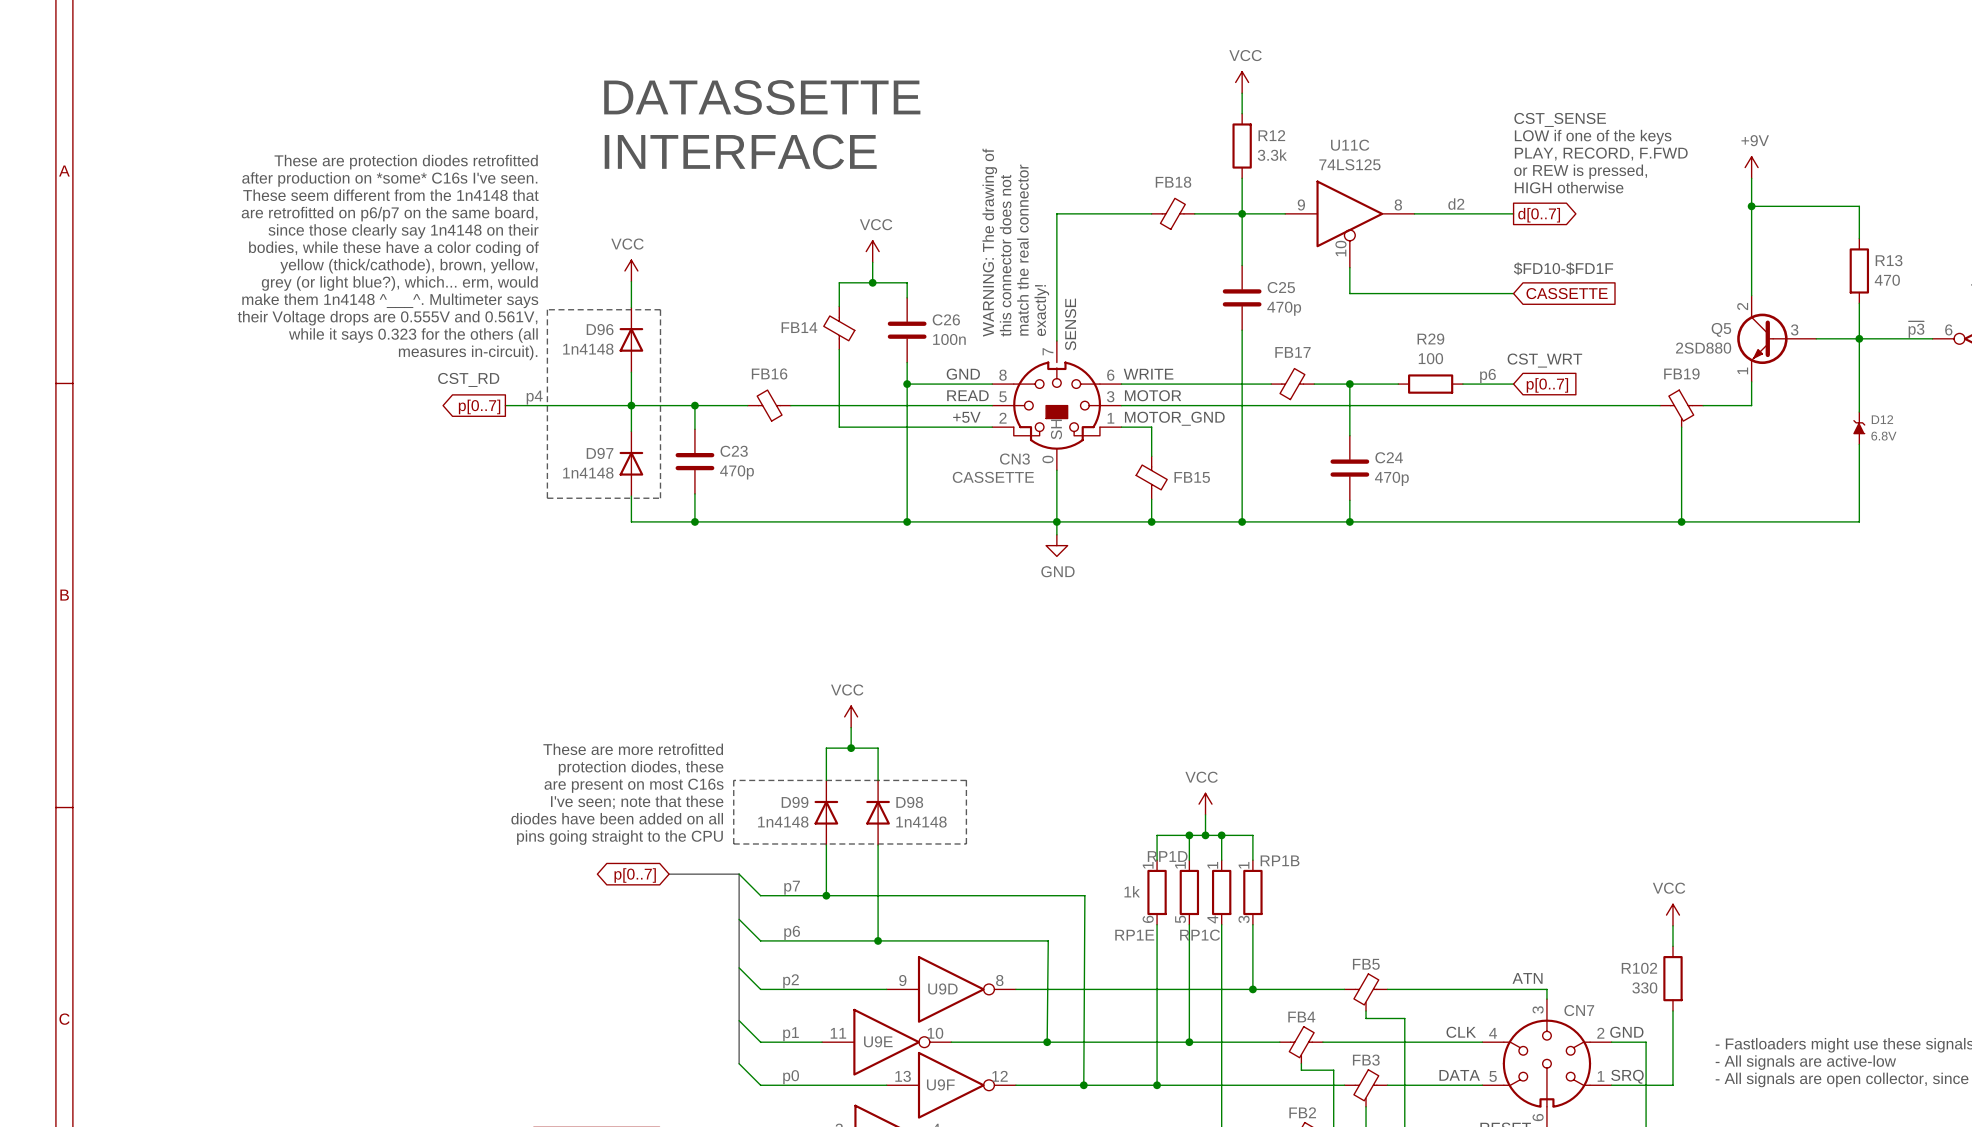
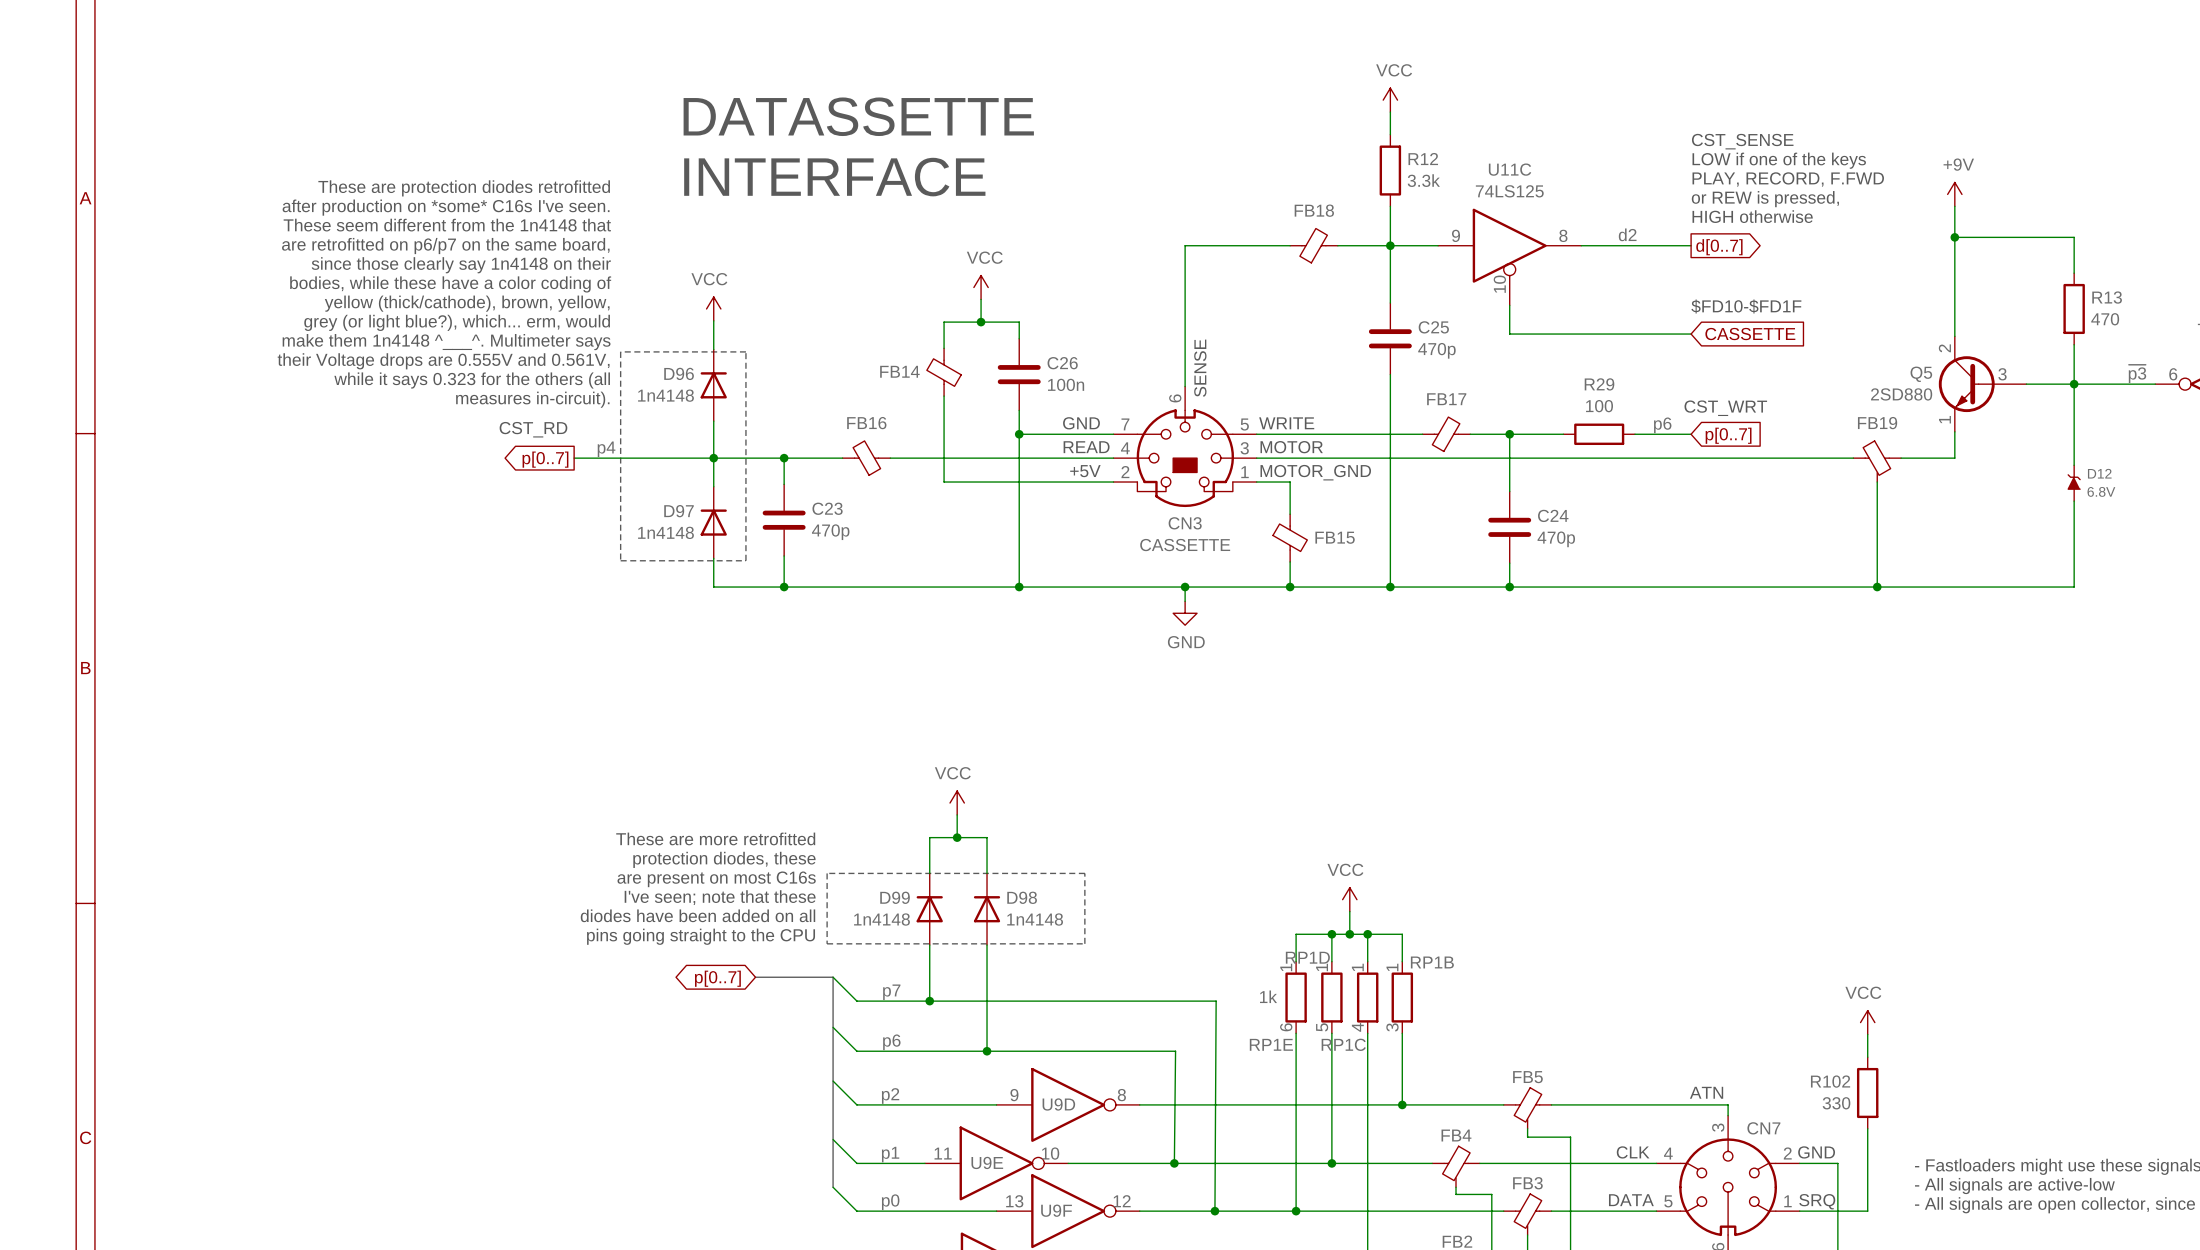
text: WARNING: The drawing of (989, 242) -> none
text: match the real connector (1022, 250) -> none
text: this connector does not (1005, 255) -> none
text: exactly! (1041, 310) -> none
CN3 symbol: [992, 340, 1122, 471] -> [1113, 386, 1257, 508]
CN3 name position: CN3 (1014, 459) -> CN3 (1185, 523)
wire: (1056, 470) (1056, 521) -> none
CN3 value position: CASSETTE (993, 477) -> CASSETTE (1185, 545)

